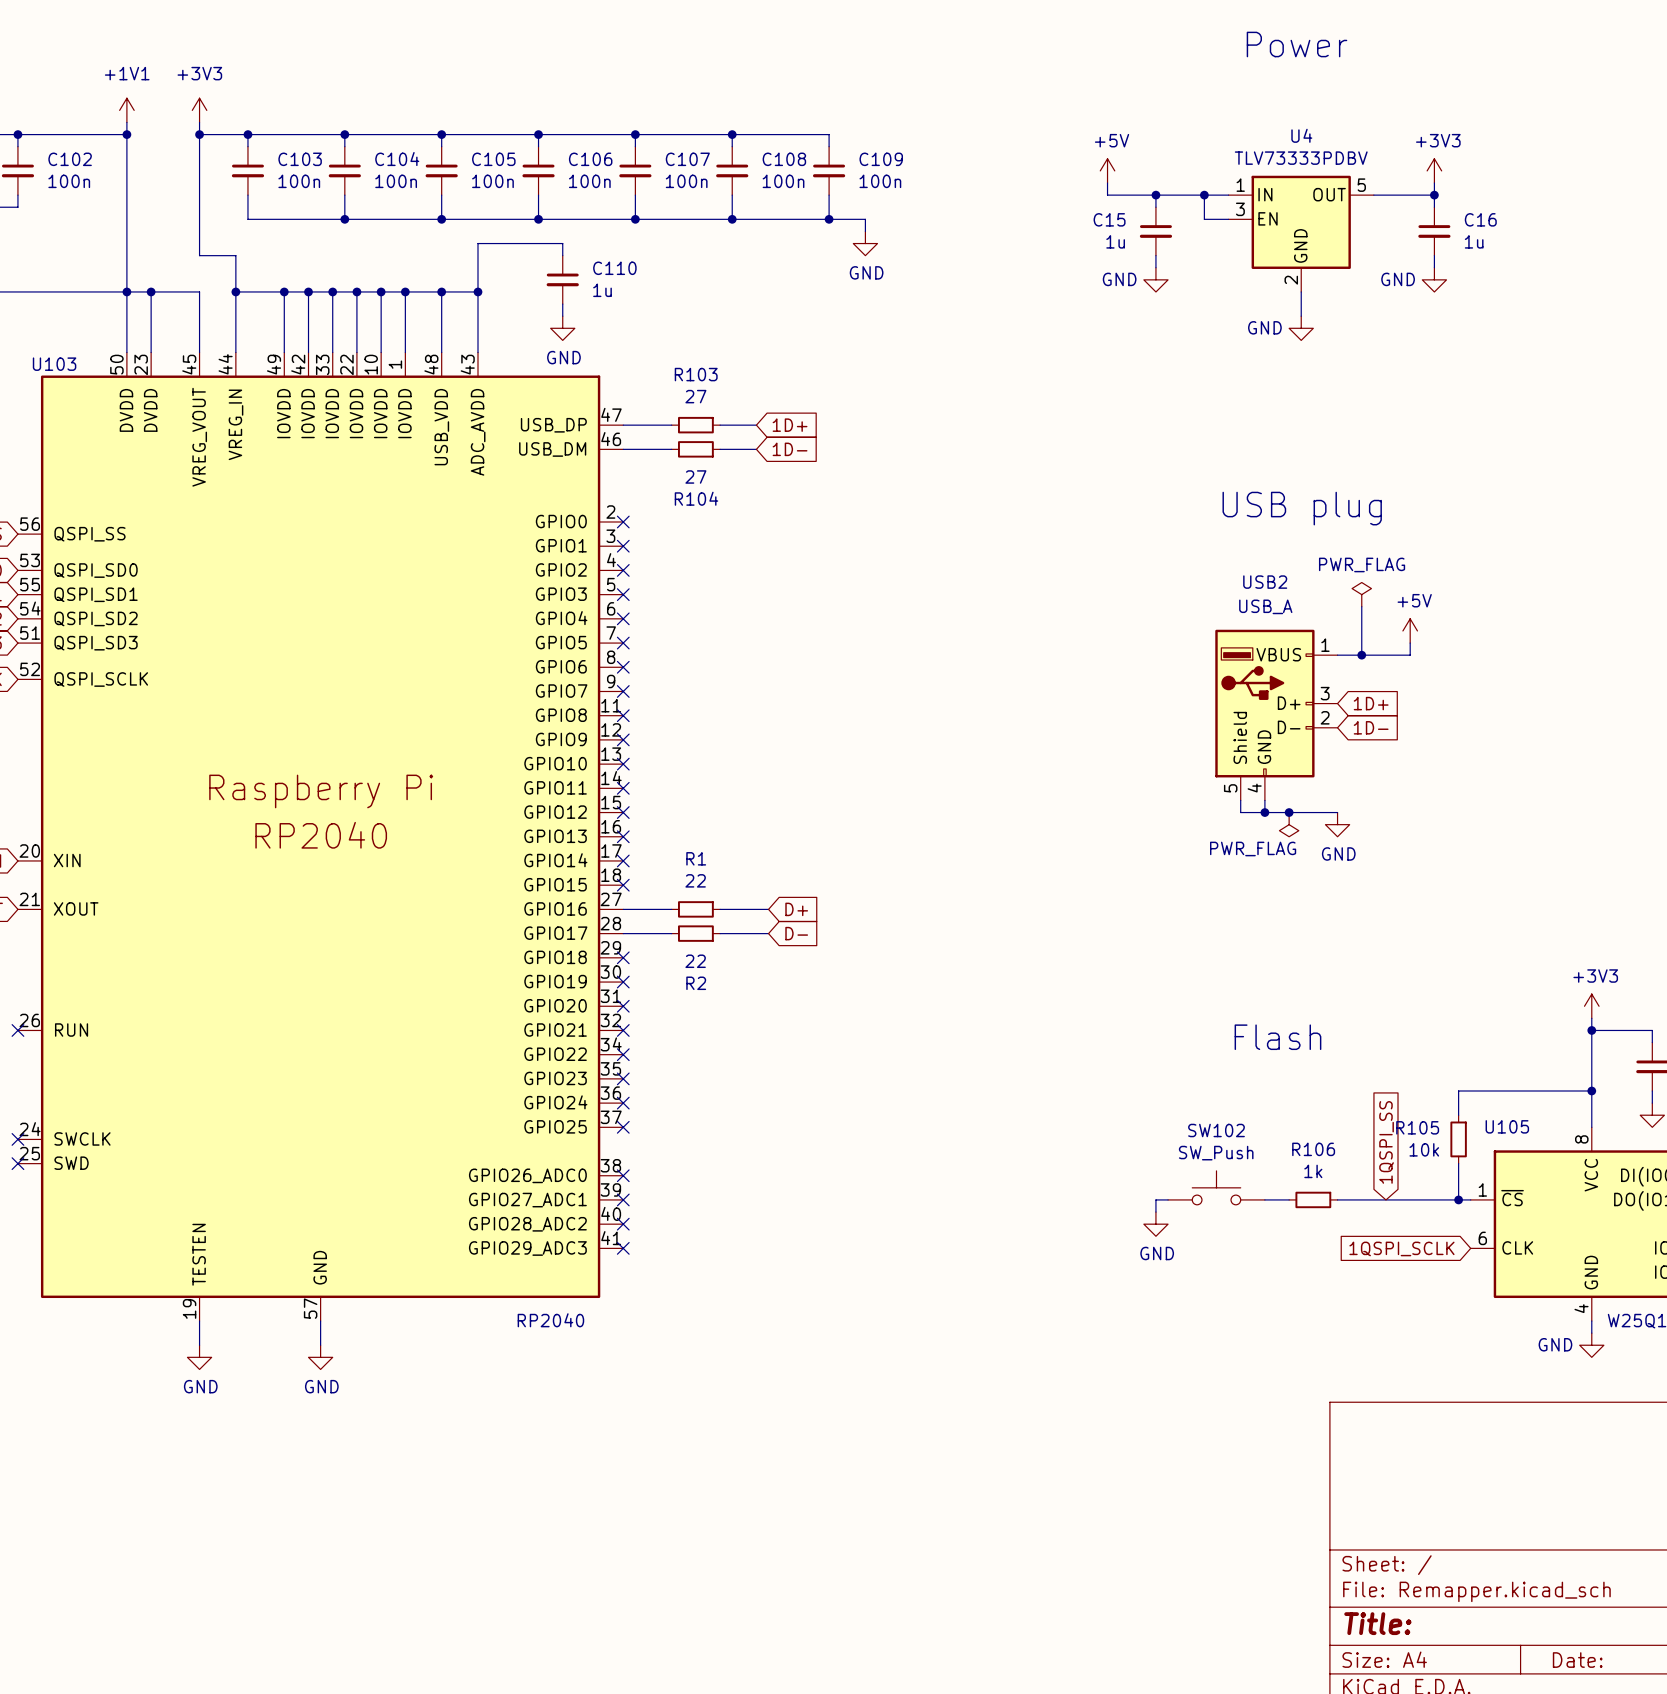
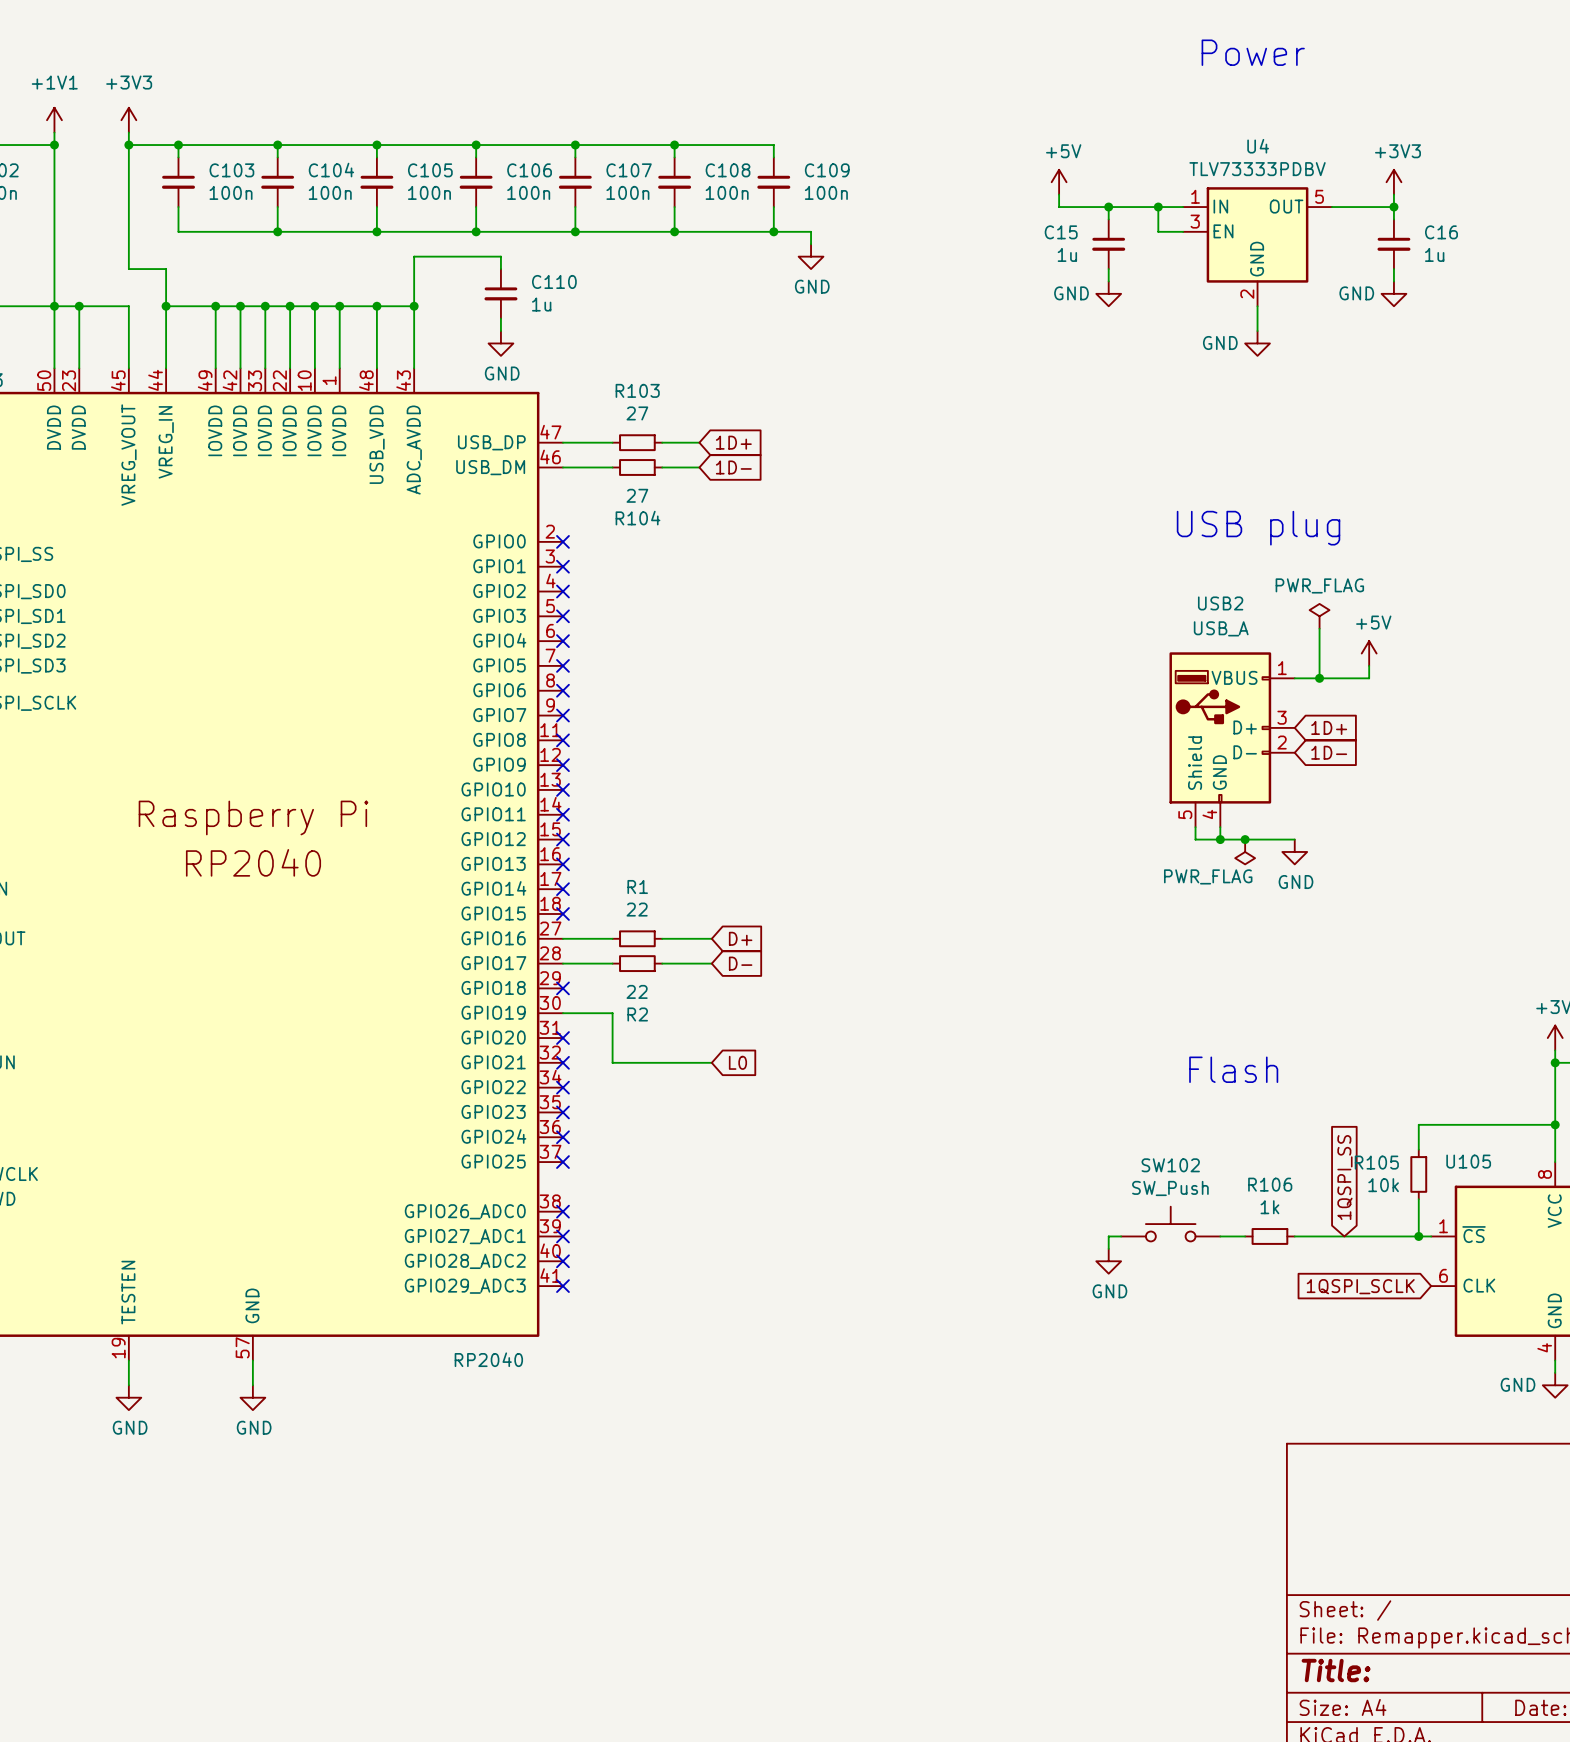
wire: none -> (562, 1013) (612, 1013) (612, 1062) (711, 1062)
no-connect mark: (623, 982) -> none
global label: none -> L0 (737, 1062)

